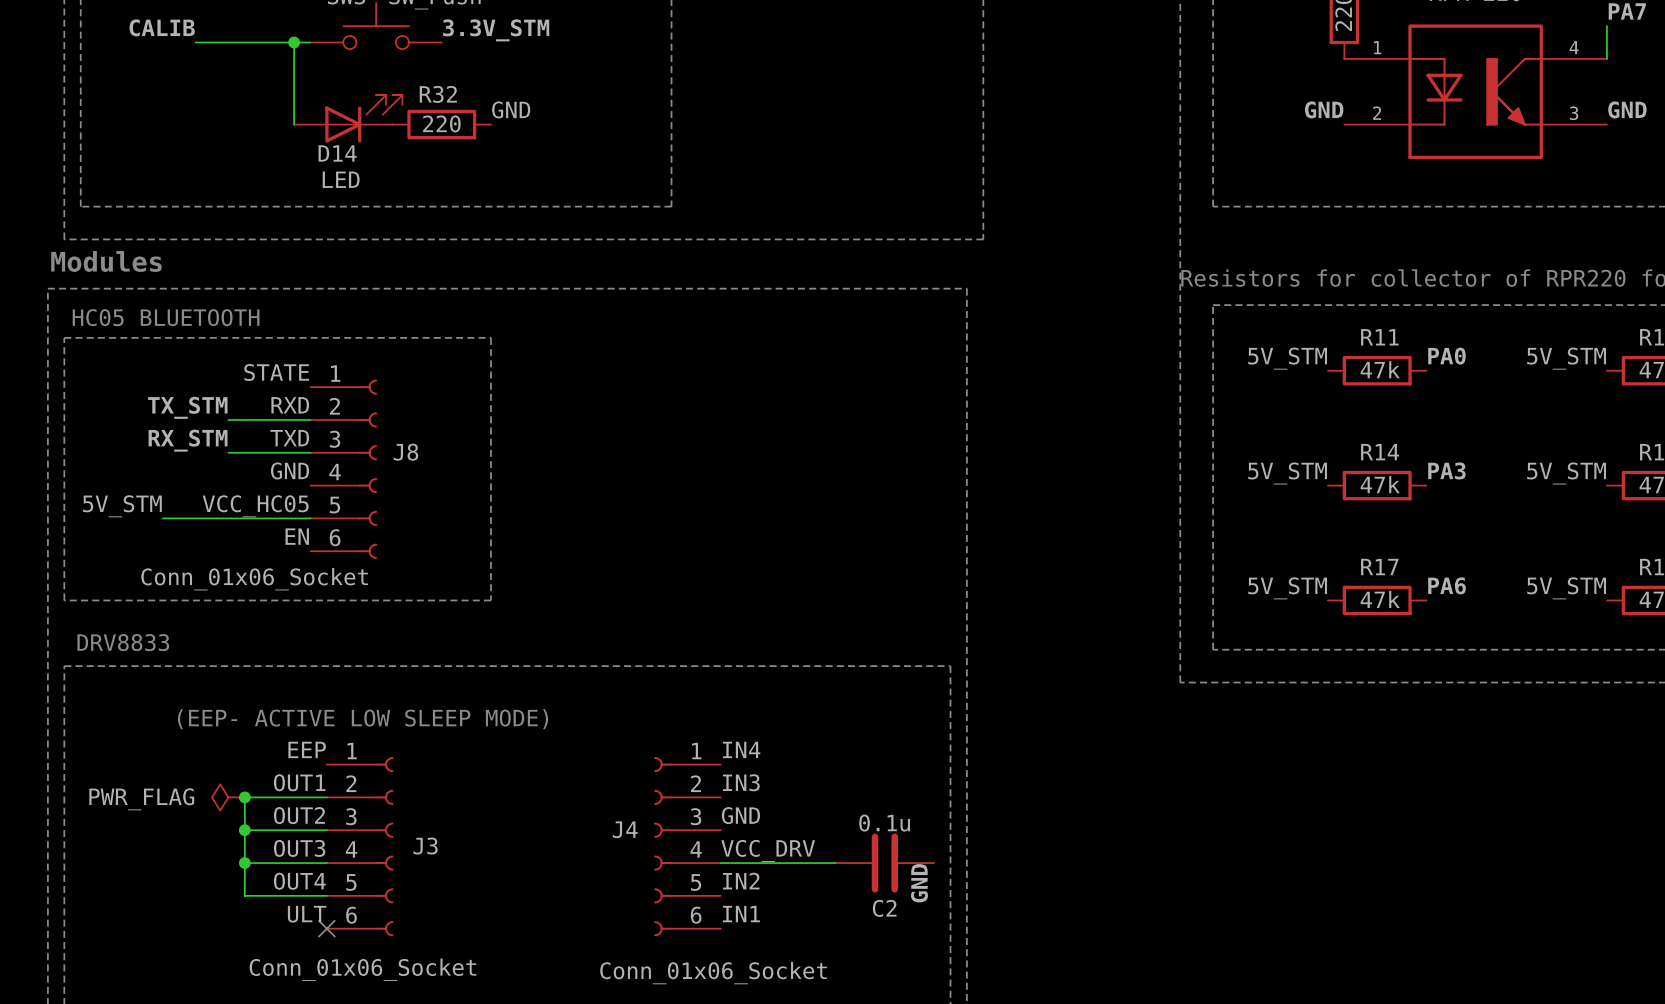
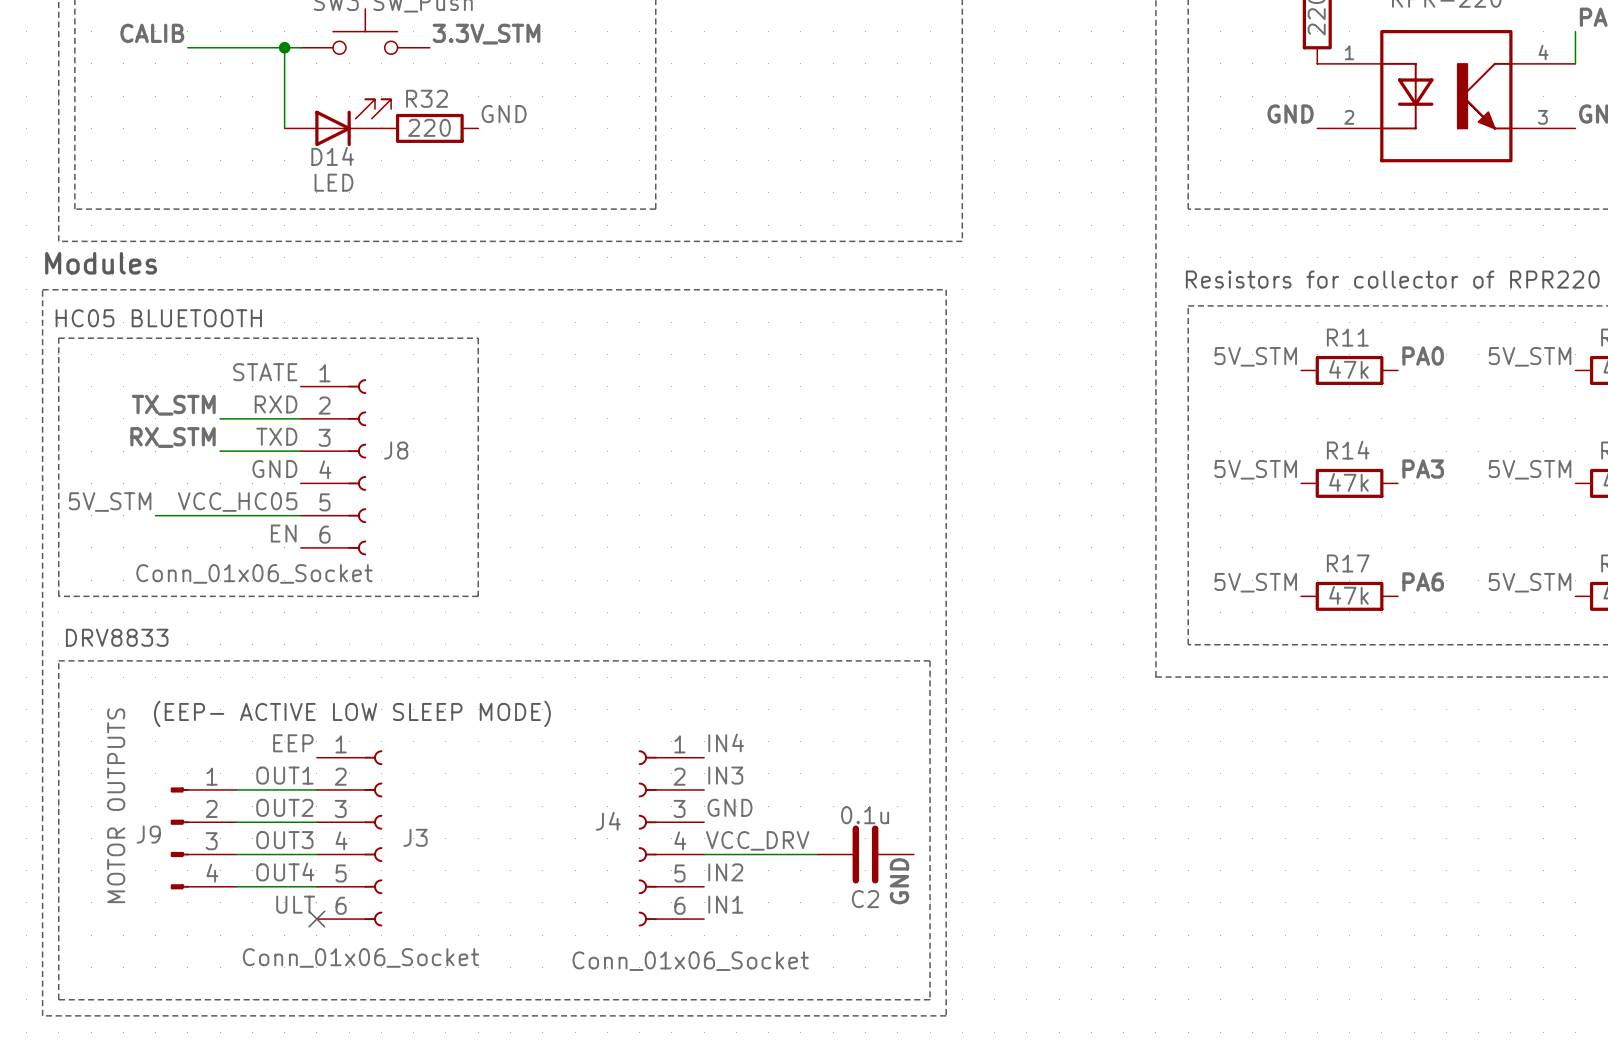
power symbol: PWR_FLAG (228, 797) -> none
wire: (244, 797) (244, 895) -> none
junction: (244, 797) -> none
junction: (244, 830) -> none
J9: none -> MOTOR OUTPUTS (203, 838)
junction: (244, 863) -> none

